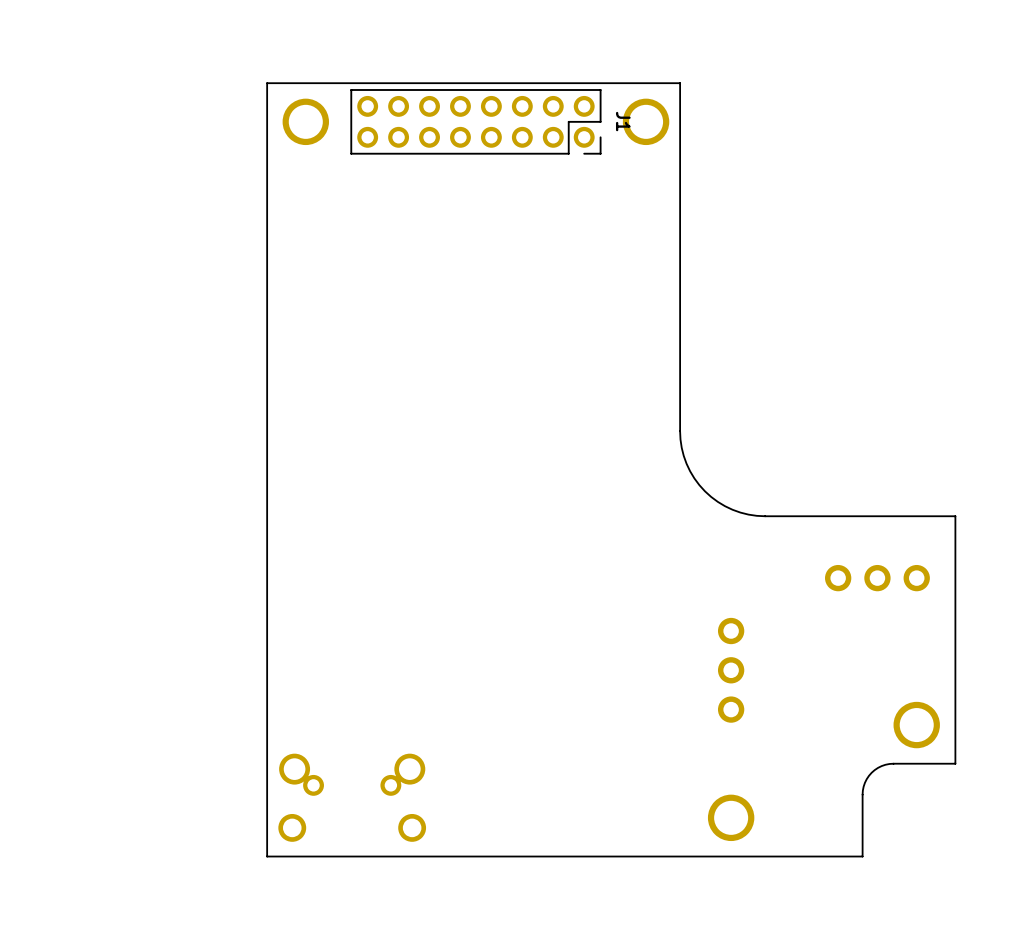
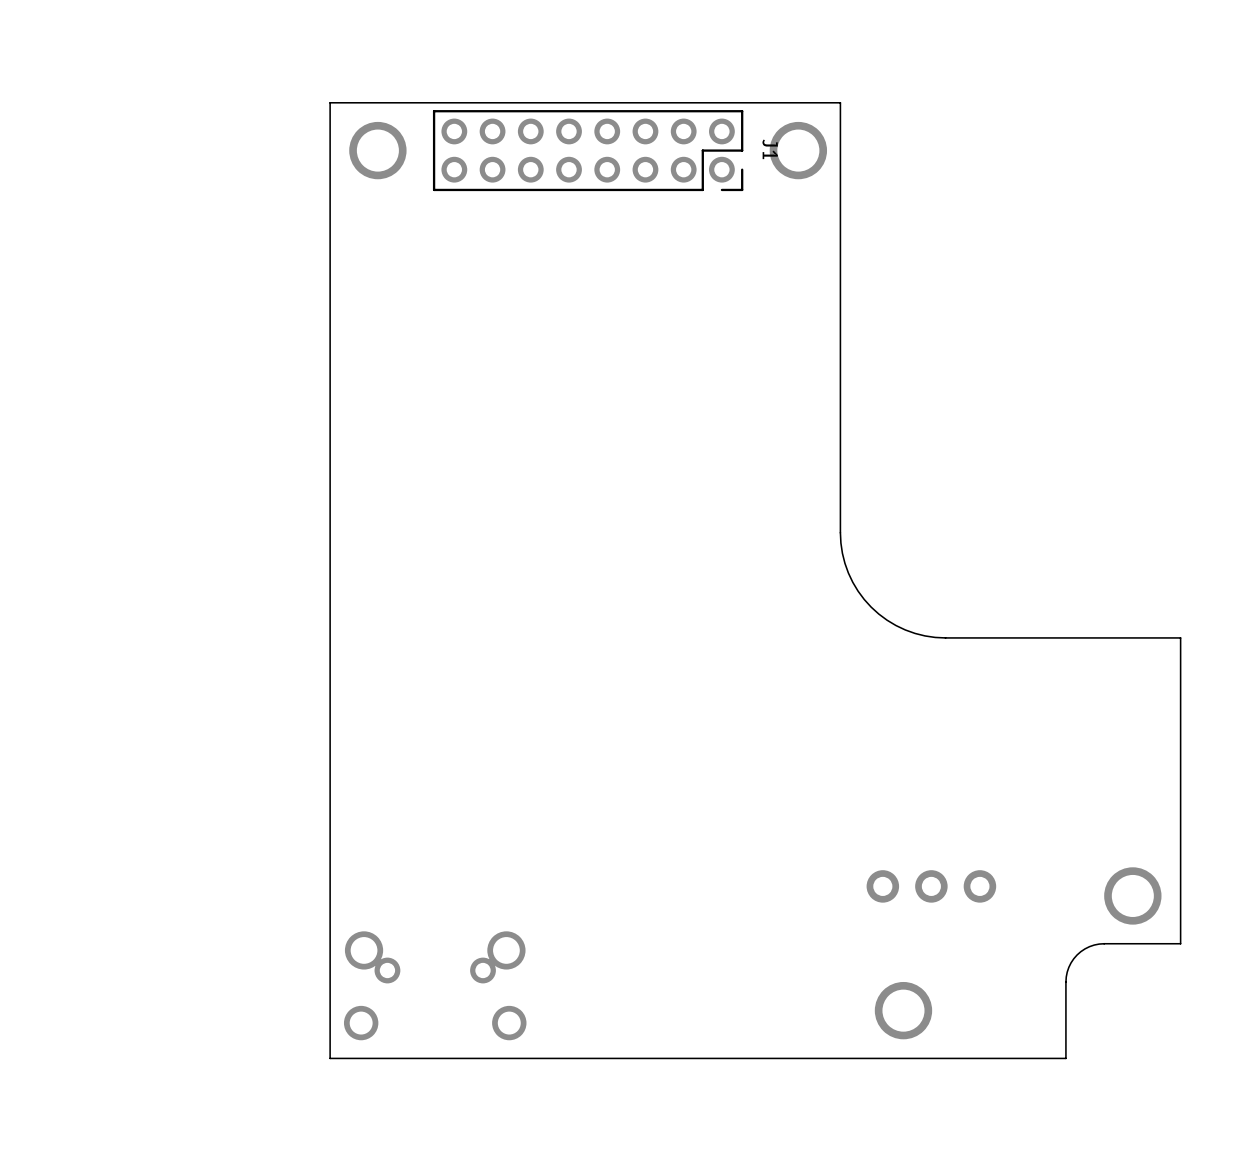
part: (877, 578) -> none
part rotation: 0° (731, 670) -> 90° clockwise (931, 886)

